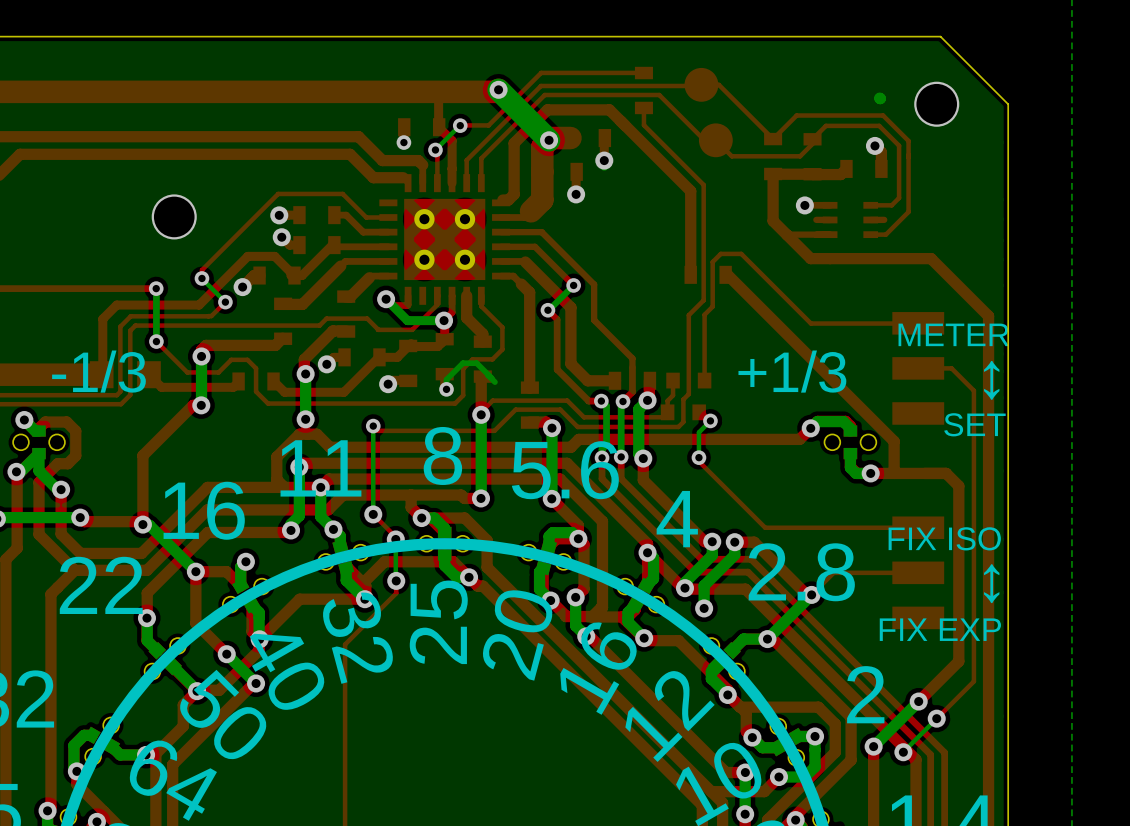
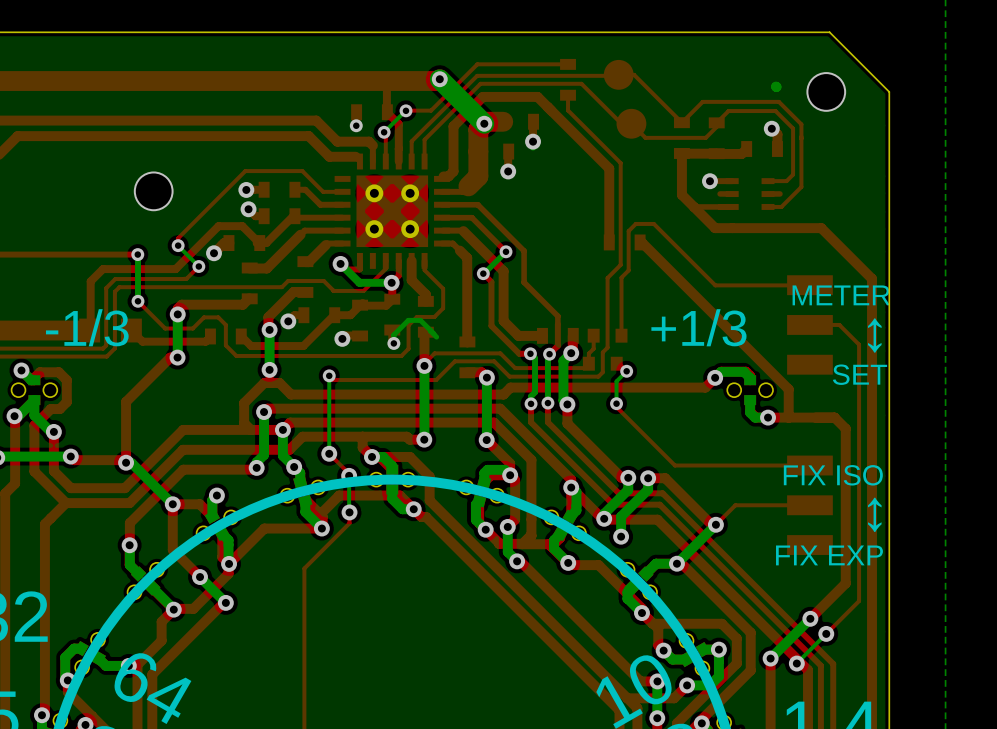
text: 8 (442, 455) -> none
text: 11 (320, 468) -> none
text: 5.6 (565, 470) -> none
text: 16 (204, 510) -> none
text: 4 (677, 519) -> none
text: 2.8 (801, 572) -> none
text: 22 (101, 585) -> none
text: 25 (438, 622) -> none
text: 20 (517, 634) -> none
text: 32 (357, 637) -> none
text: 16 (599, 667) -> none
text: 40 (288, 672) -> none
text: 2 (865, 694) -> none
text: 50 (223, 715) -> none
text: 12 (670, 716) -> none

